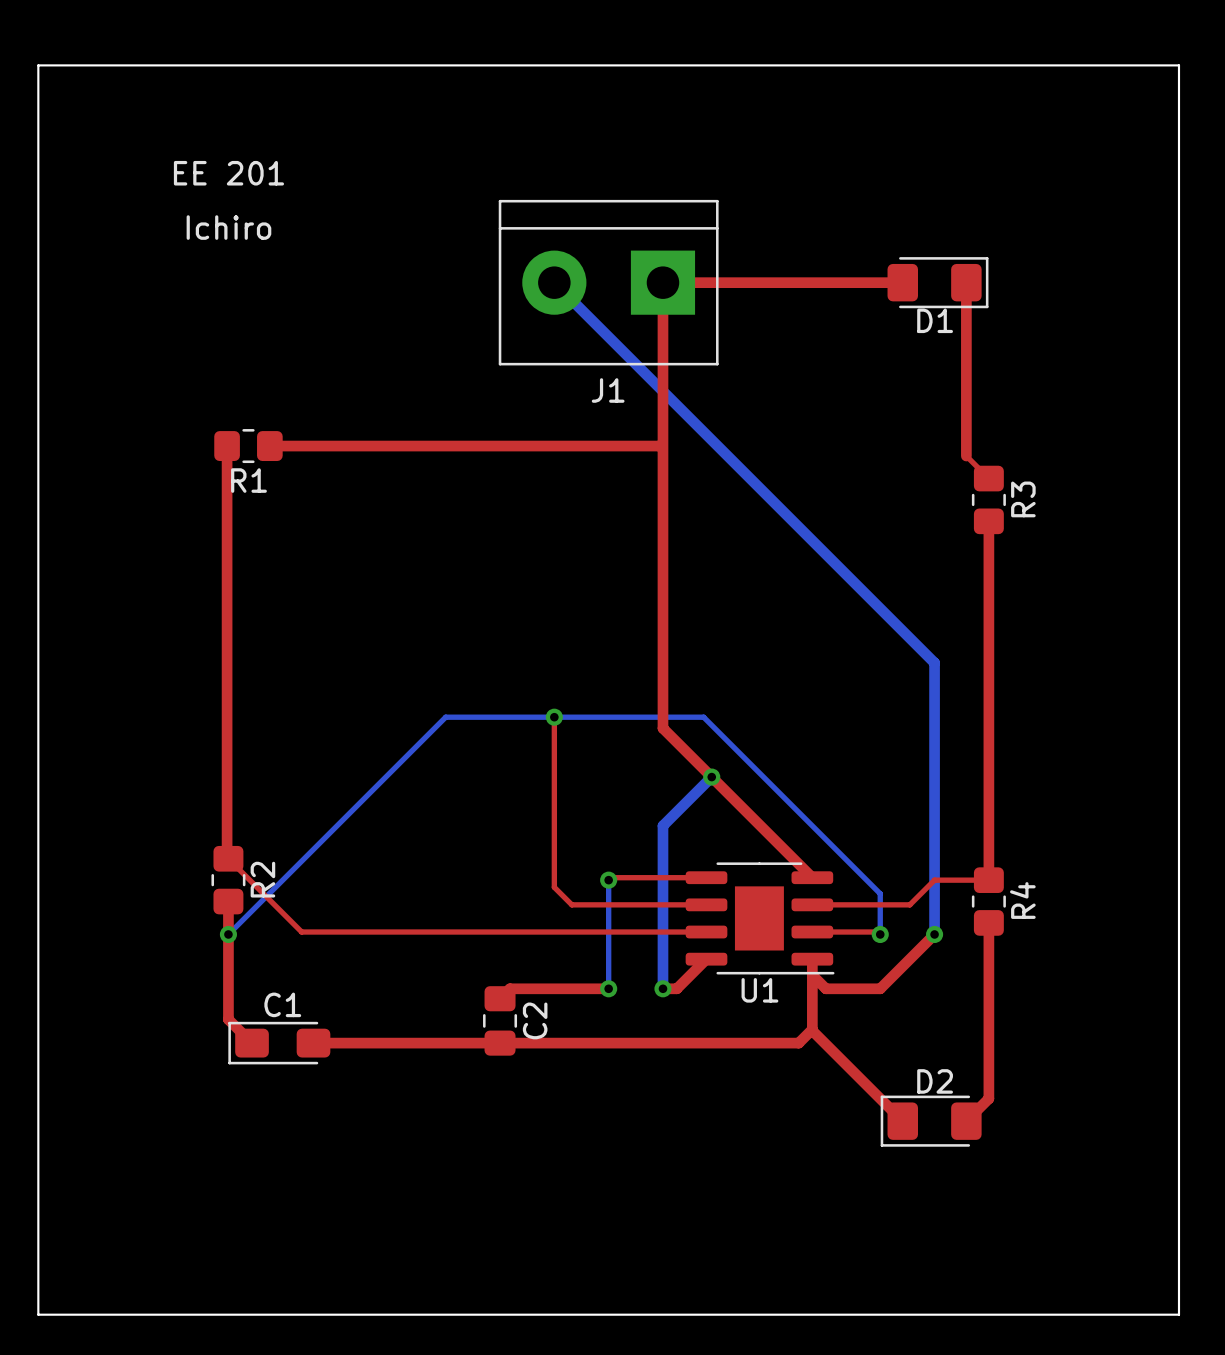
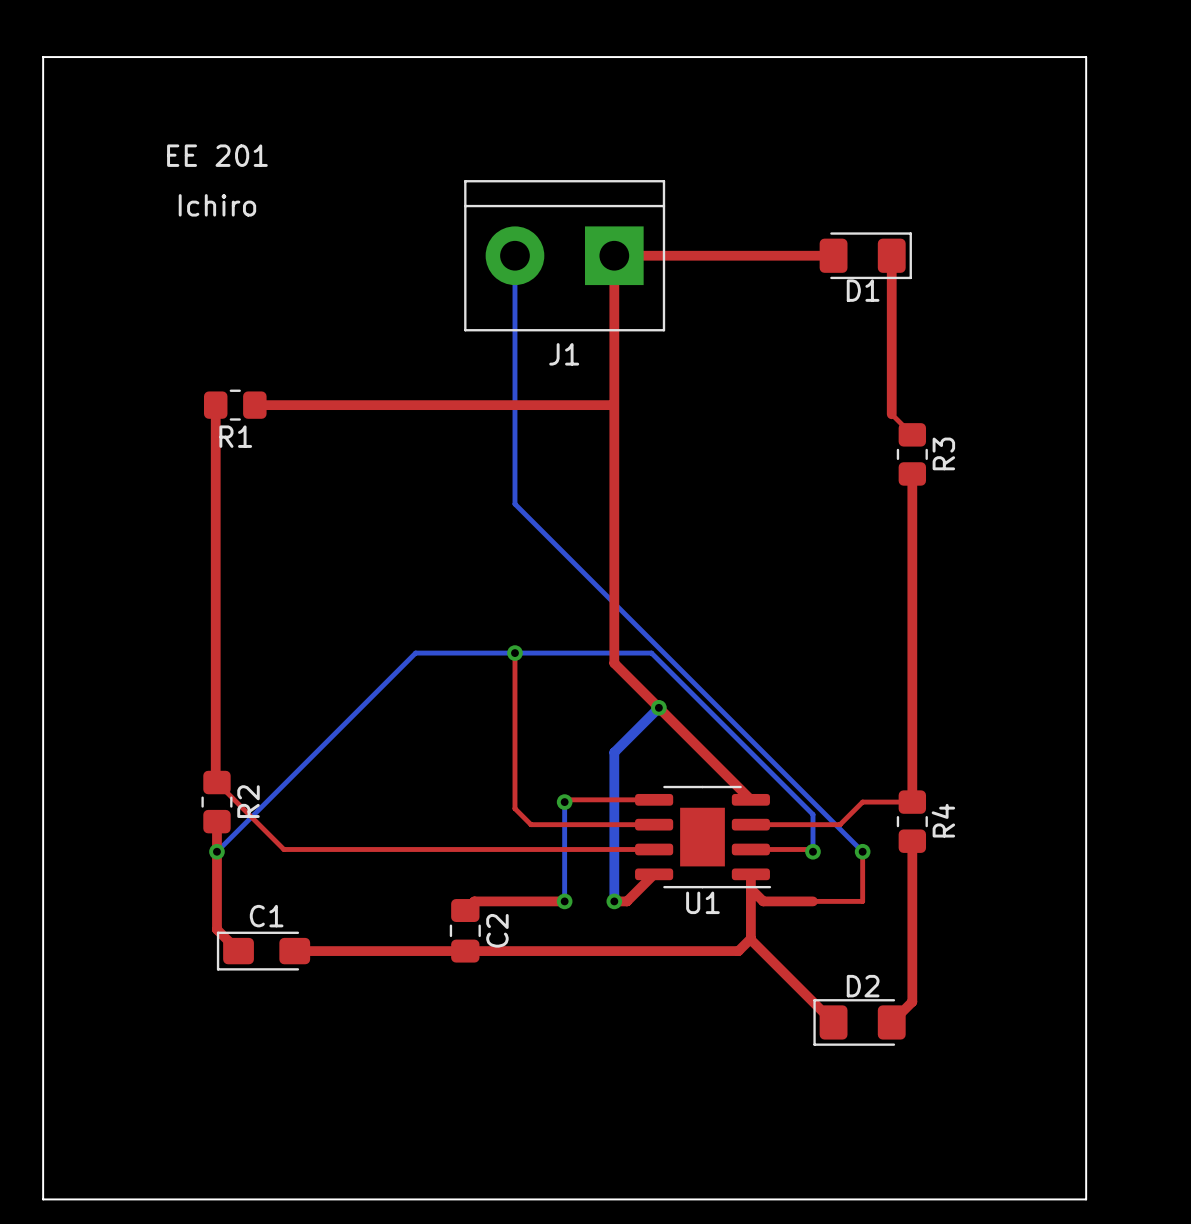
bottom track: (554, 282) (934, 662) (934, 934) -> (514, 255) (514, 504) (862, 851)
top track: (934, 934) (880, 988) -> (862, 851) (862, 901) (812, 901)

